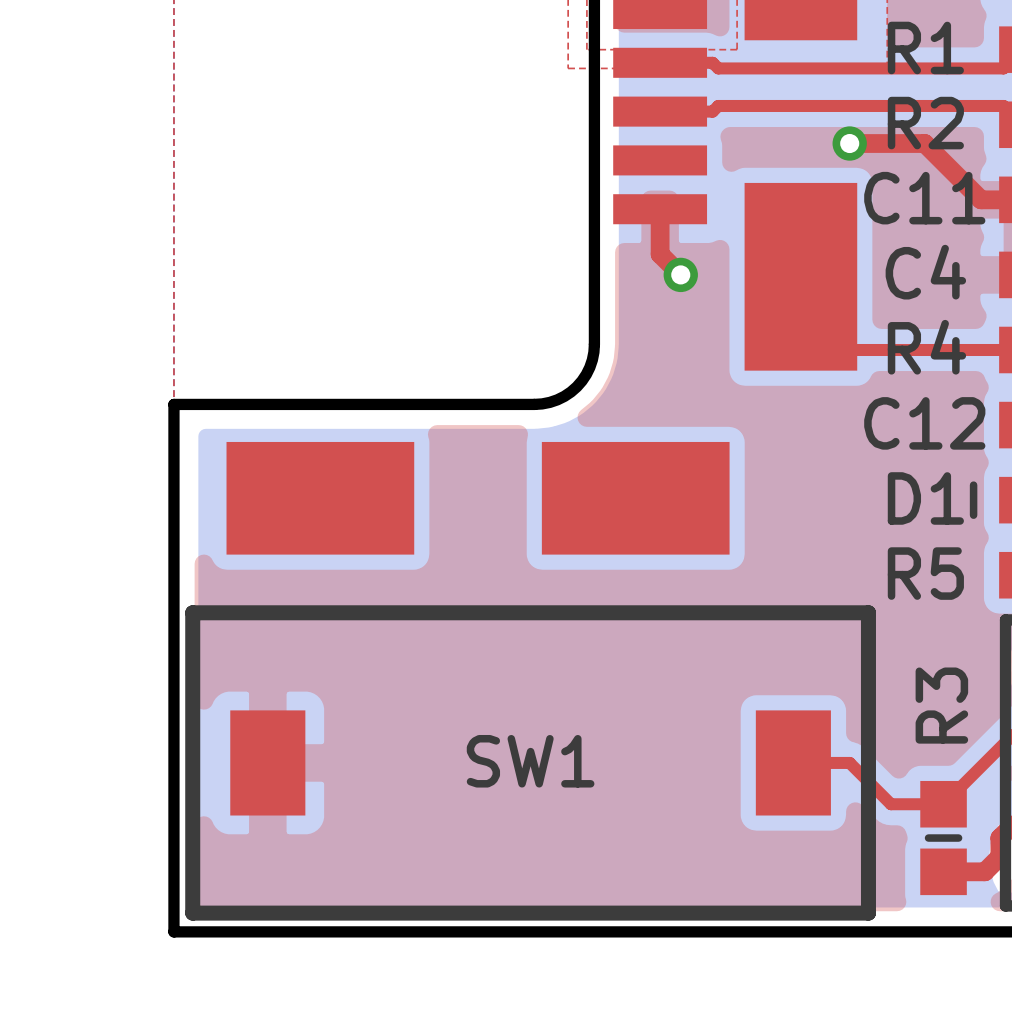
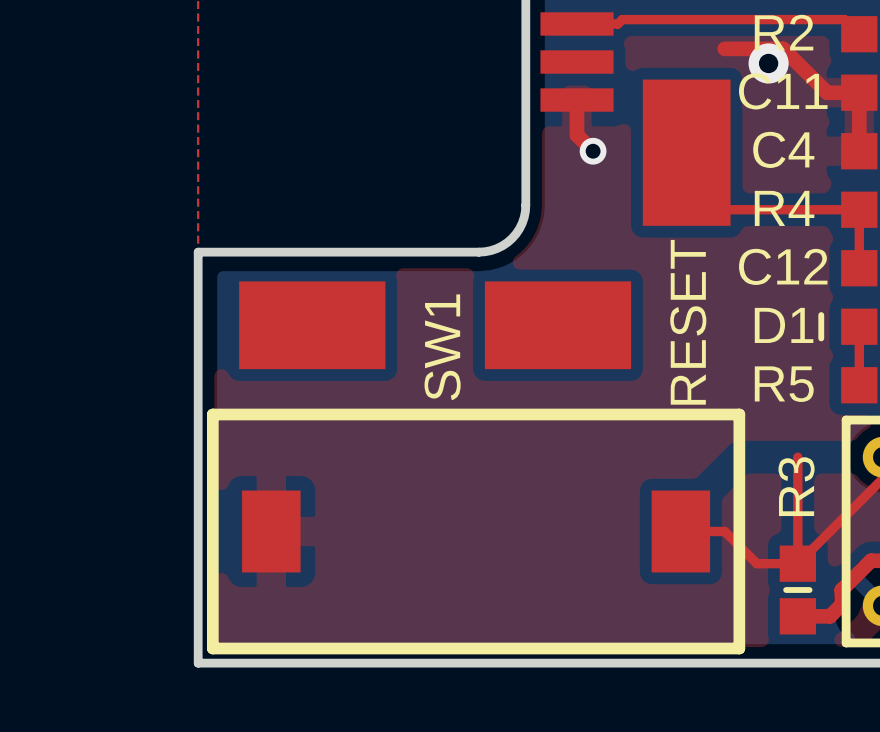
via: (849, 143) -> none
via: none -> (768, 63)
SW1 value: none -> RESET (688, 322)
top track: none -> (797, 457) (797, 563)
SW1 name rotation: 0° (530, 761) -> 90° counterclockwise (442, 347)
SW1 name position: SW1 (530, 761) -> SW1 (442, 347)

